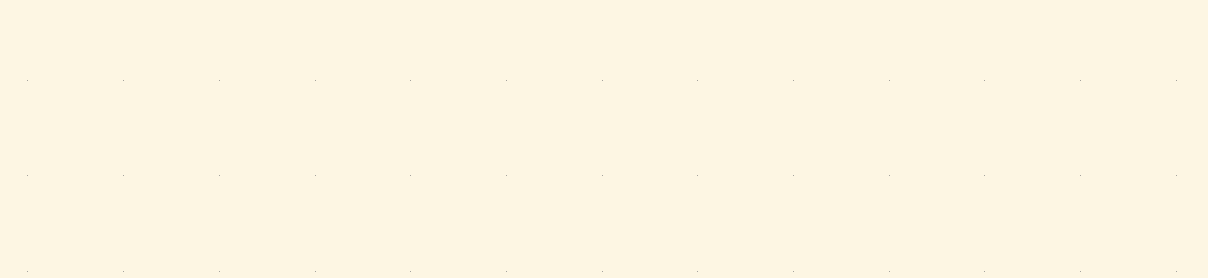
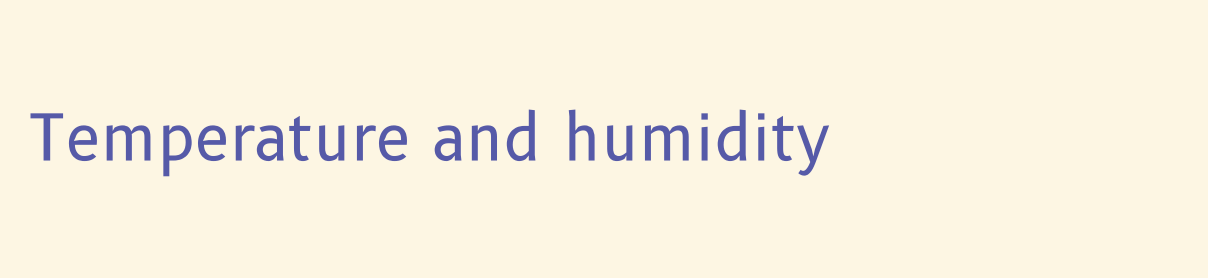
text: none -> Temperature and humidity (429, 142)

